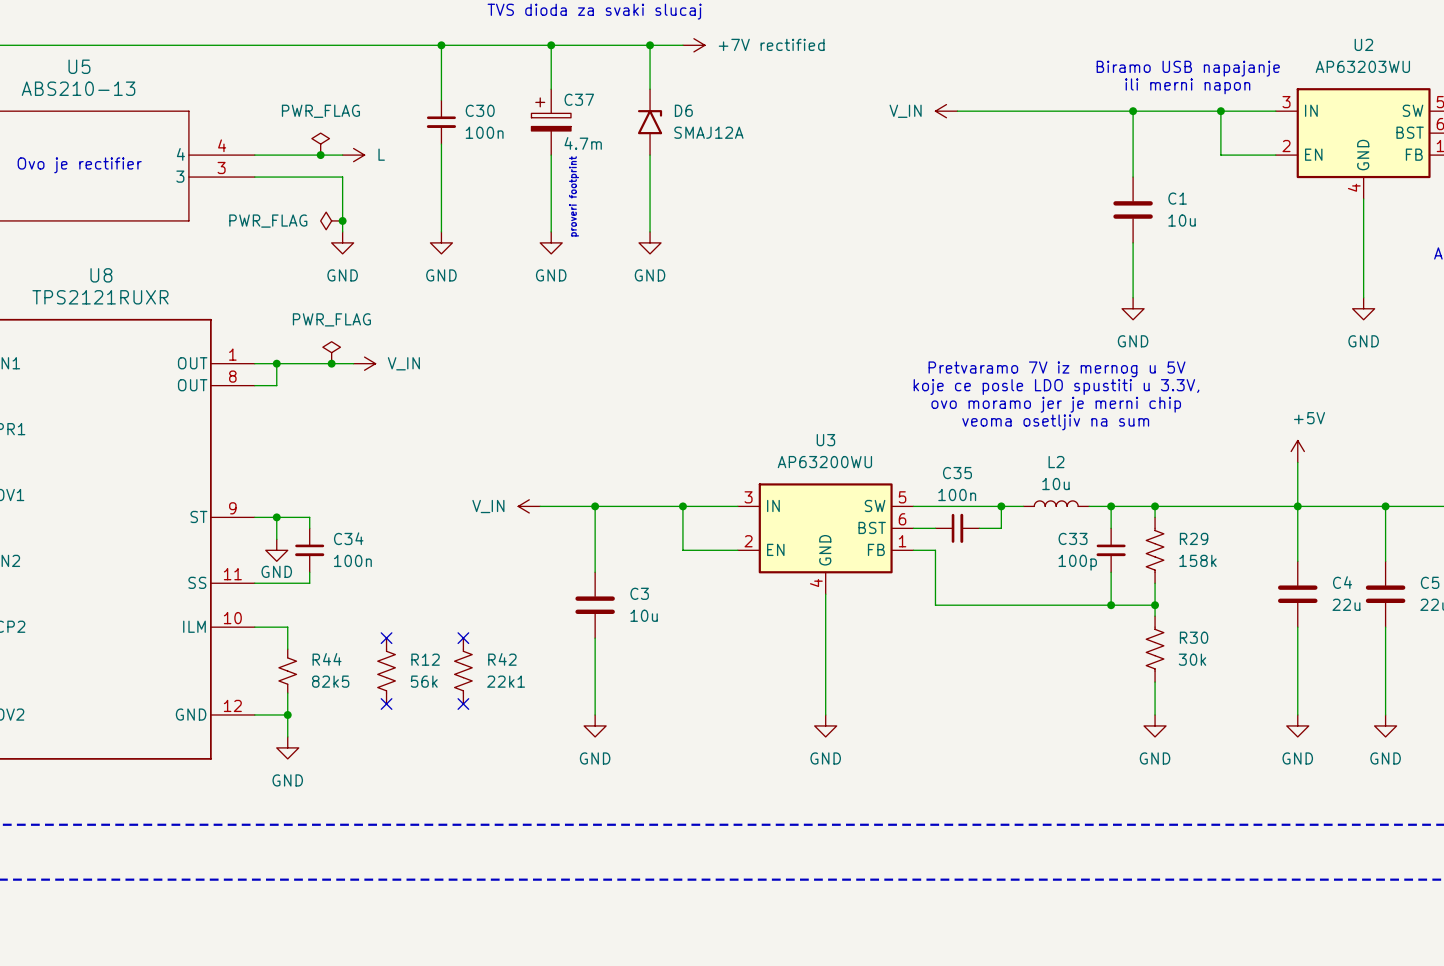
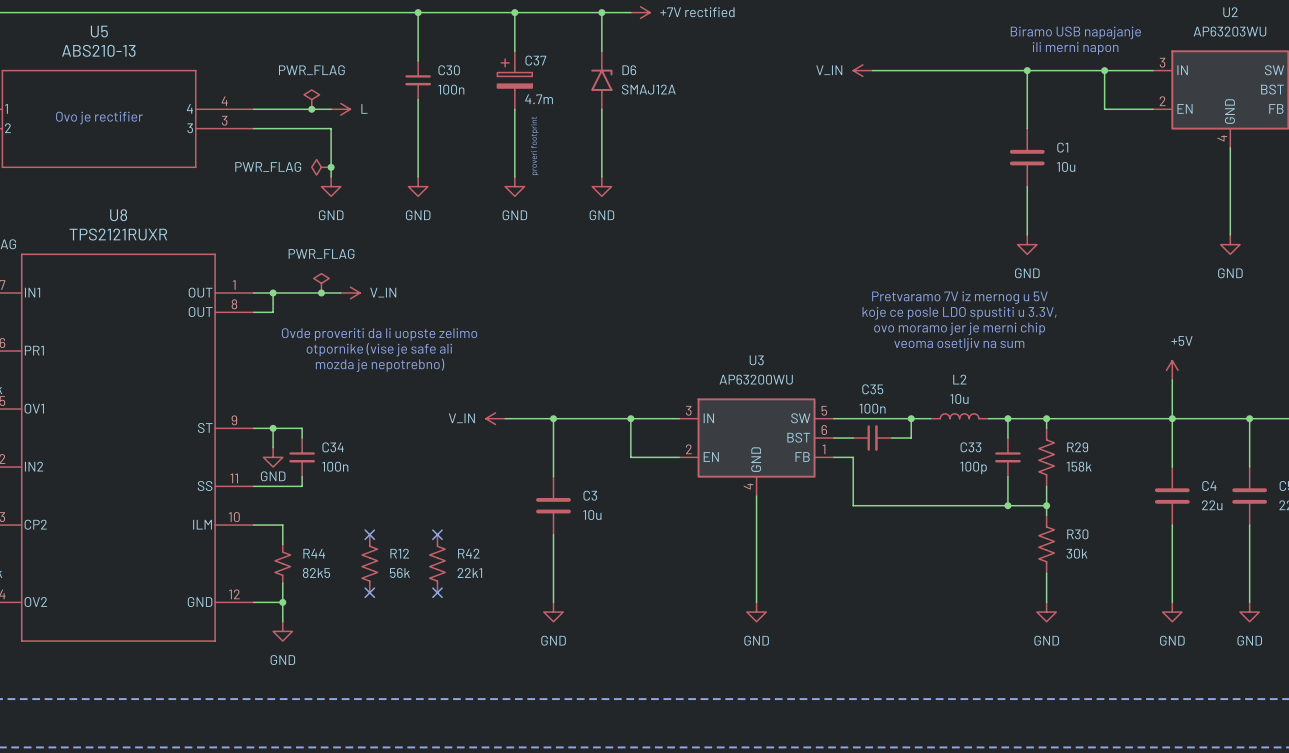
text: none -> Ovde proveriti da li uopste zelimo (379, 334)
text: none -> otpornike (vise je safe ali (379, 349)
text: none -> mozda je nepotrebno) (380, 365)

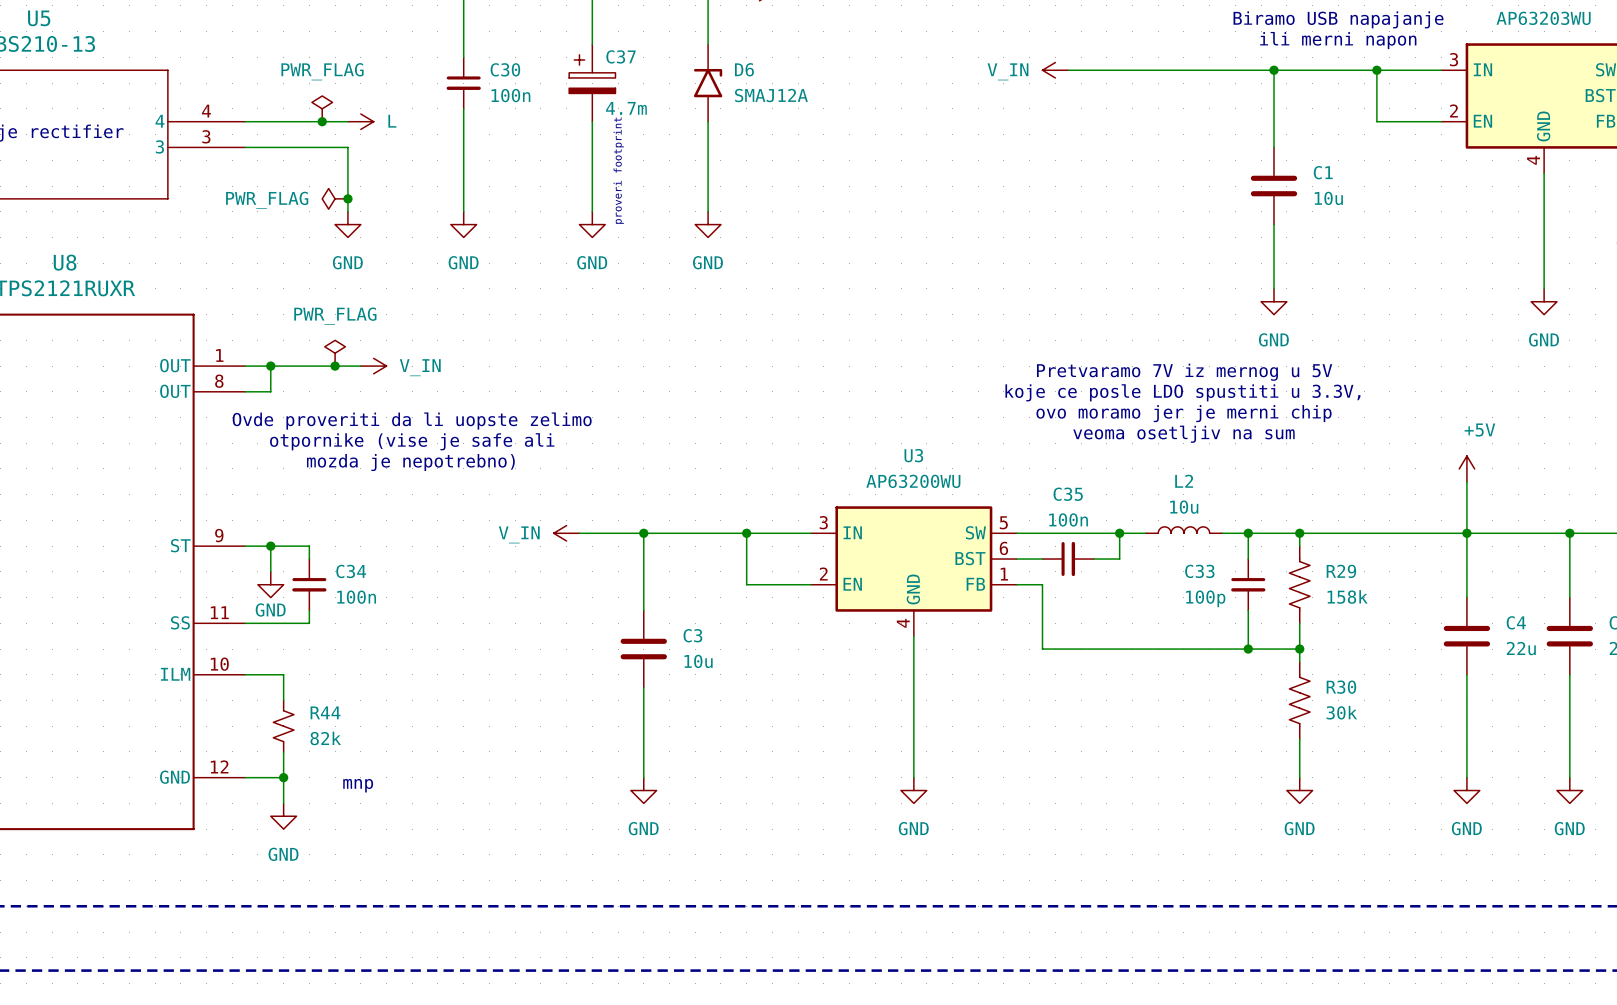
no-connect mark: (369, 534) -> none
no-connect mark: (437, 534) -> none
R12: 56k (369, 563) -> none
R42: 22k1 (437, 563) -> none
R44 value: 82k5 (316, 573) -> 82k (325, 738)
no-connect mark: (369, 592) -> none
no-connect mark: (437, 592) -> none
text: none -> mnp (358, 785)

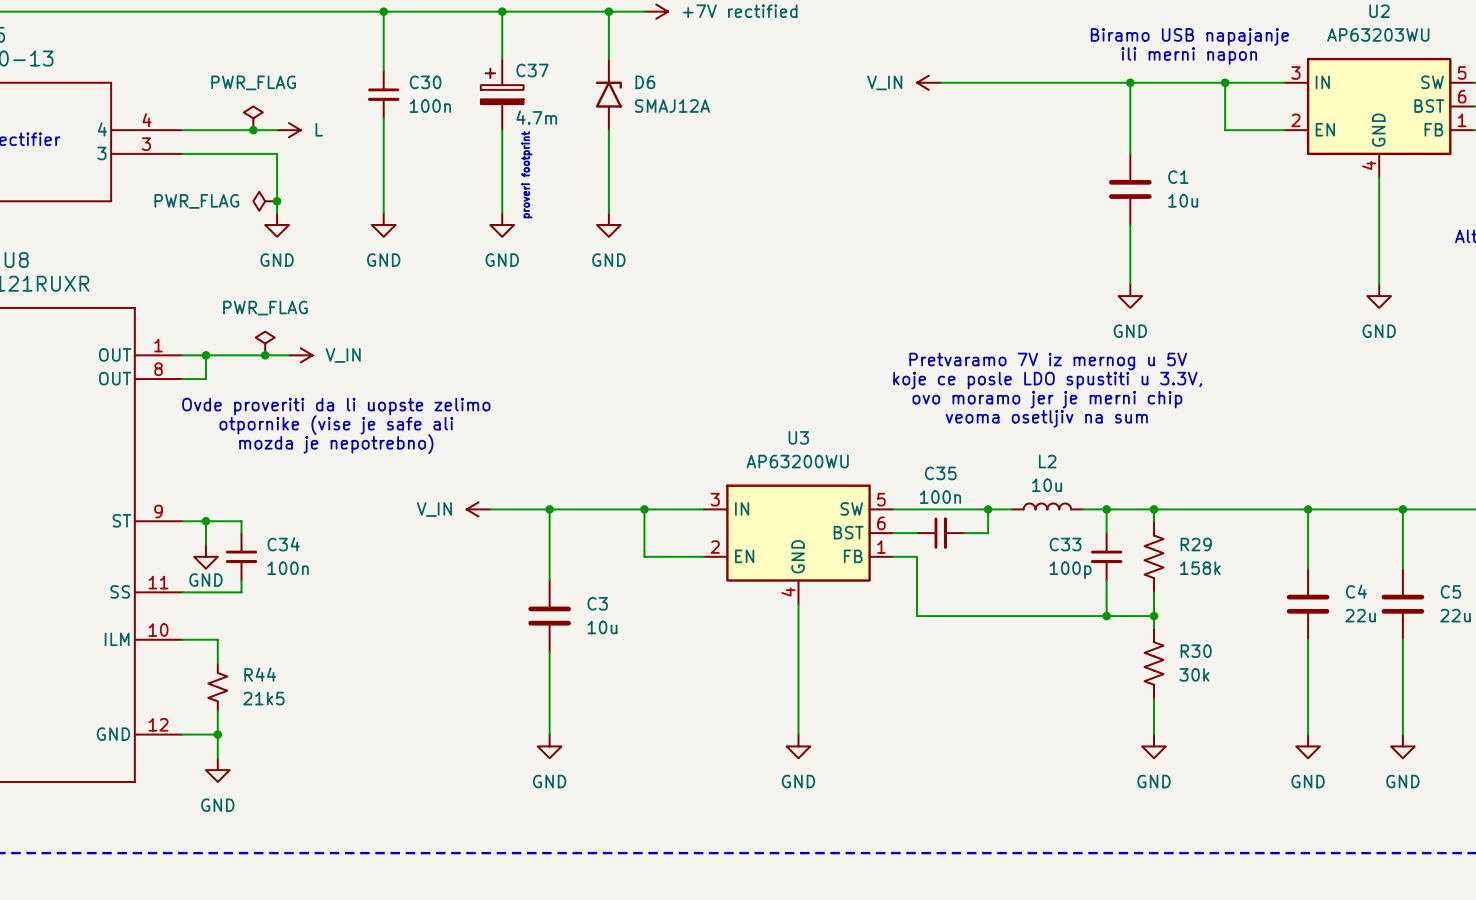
power symbol: +5V (1466, 468) -> none
wire: (1466, 481) (1466, 533) -> none
R44 value: 82k (325, 738) -> 21k5 (263, 698)
text: mnp (358, 785) -> none

